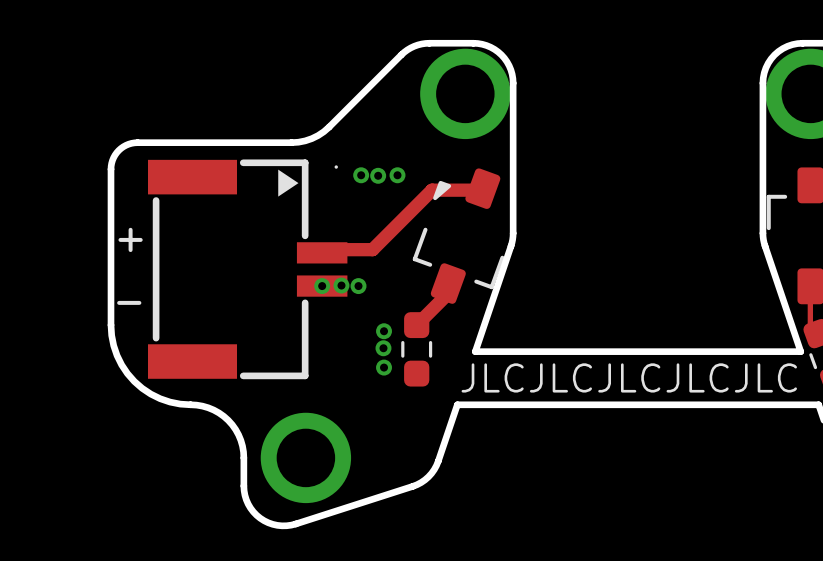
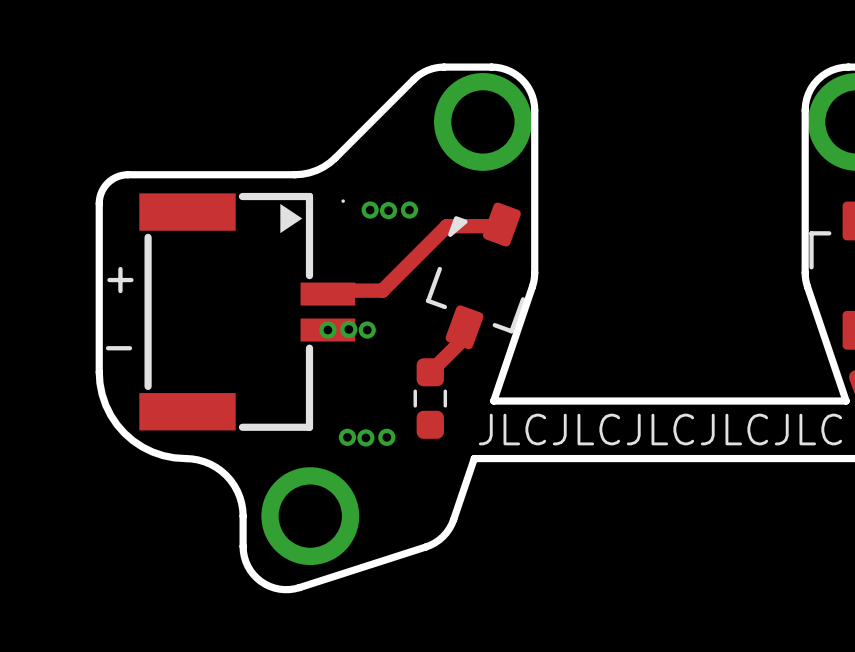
via: (384, 331) -> none
via: (383, 348) -> none
via: (384, 367) -> none
via: none -> (347, 437)
via: none -> (365, 437)
via: none -> (386, 437)

